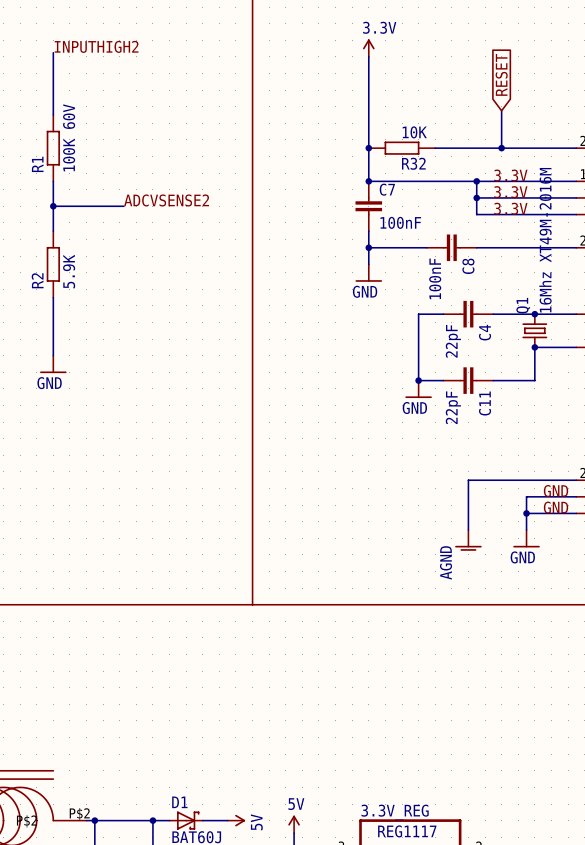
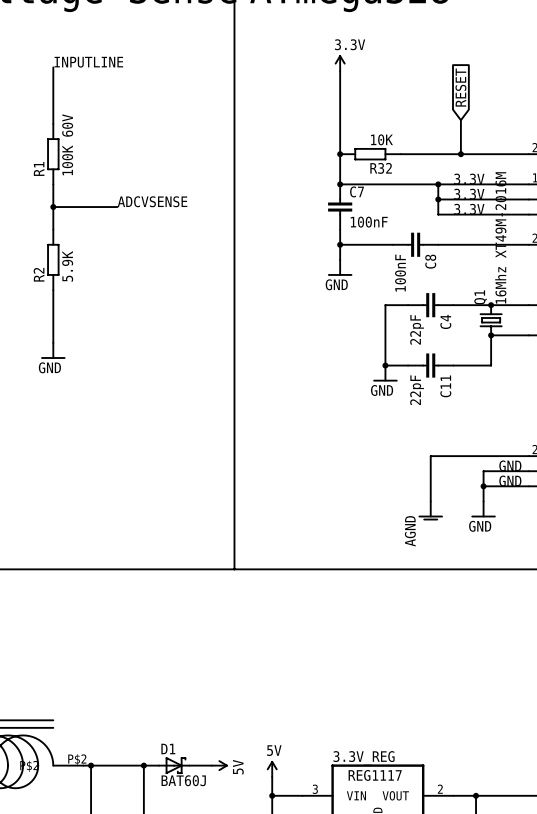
label: INPUTHIGH2 (96, 46) -> INPUTLINE (88, 62)
label: ADCVSENSE2 (166, 200) -> ADCVSENSE (152, 201)

